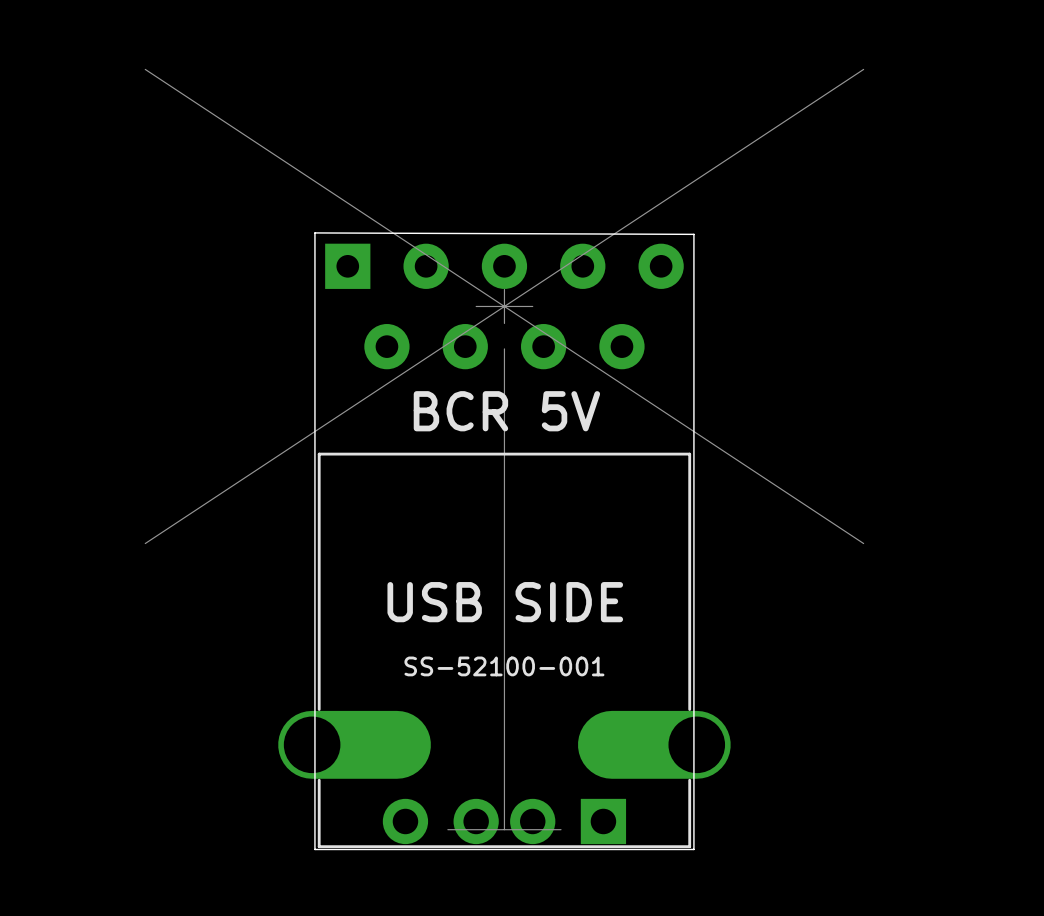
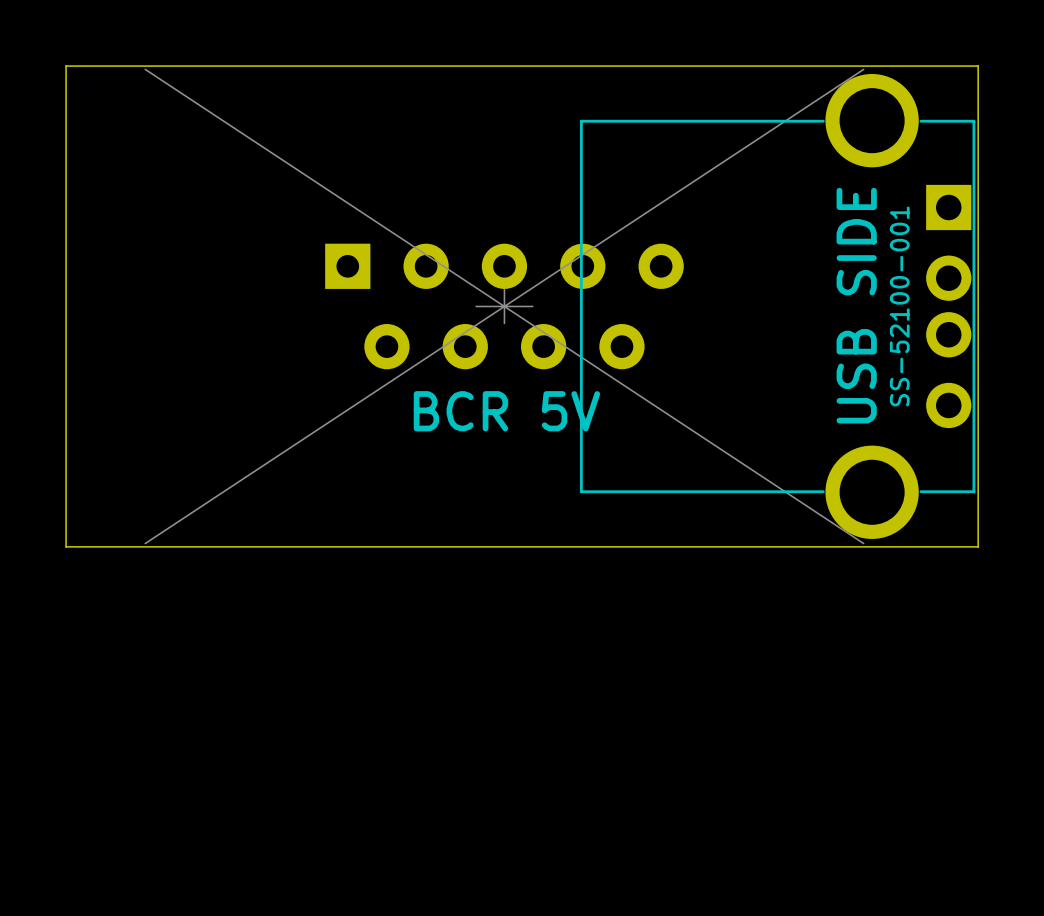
board edge: none -> (66, 66) (66, 546) (978, 546) (978, 66) (66, 66)
board edge: (314, 232) (314, 849) (693, 849) (693, 234) (314, 232) -> none
part: none -> (777, 306)
line: (504, 348) (504, 829) -> none
text rotation: 0° (505, 602) -> 90° counterclockwise (856, 305)
text position: USB SIDE (505, 602) -> USB SIDE (856, 305)
part: (504, 650) -> none
text rotation: 0° (504, 666) -> 90° counterclockwise (899, 306)
text position: SS-52100-001 (504, 666) -> SS-52100-001 (899, 306)
line: (447, 829) (561, 829) -> none

